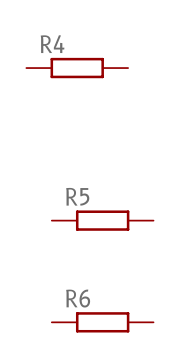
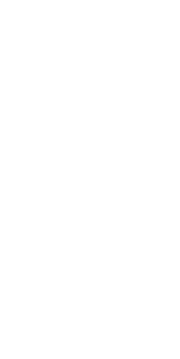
R4: (77, 68) -> none
R5: (102, 220) -> none
R6: (102, 322) -> none

